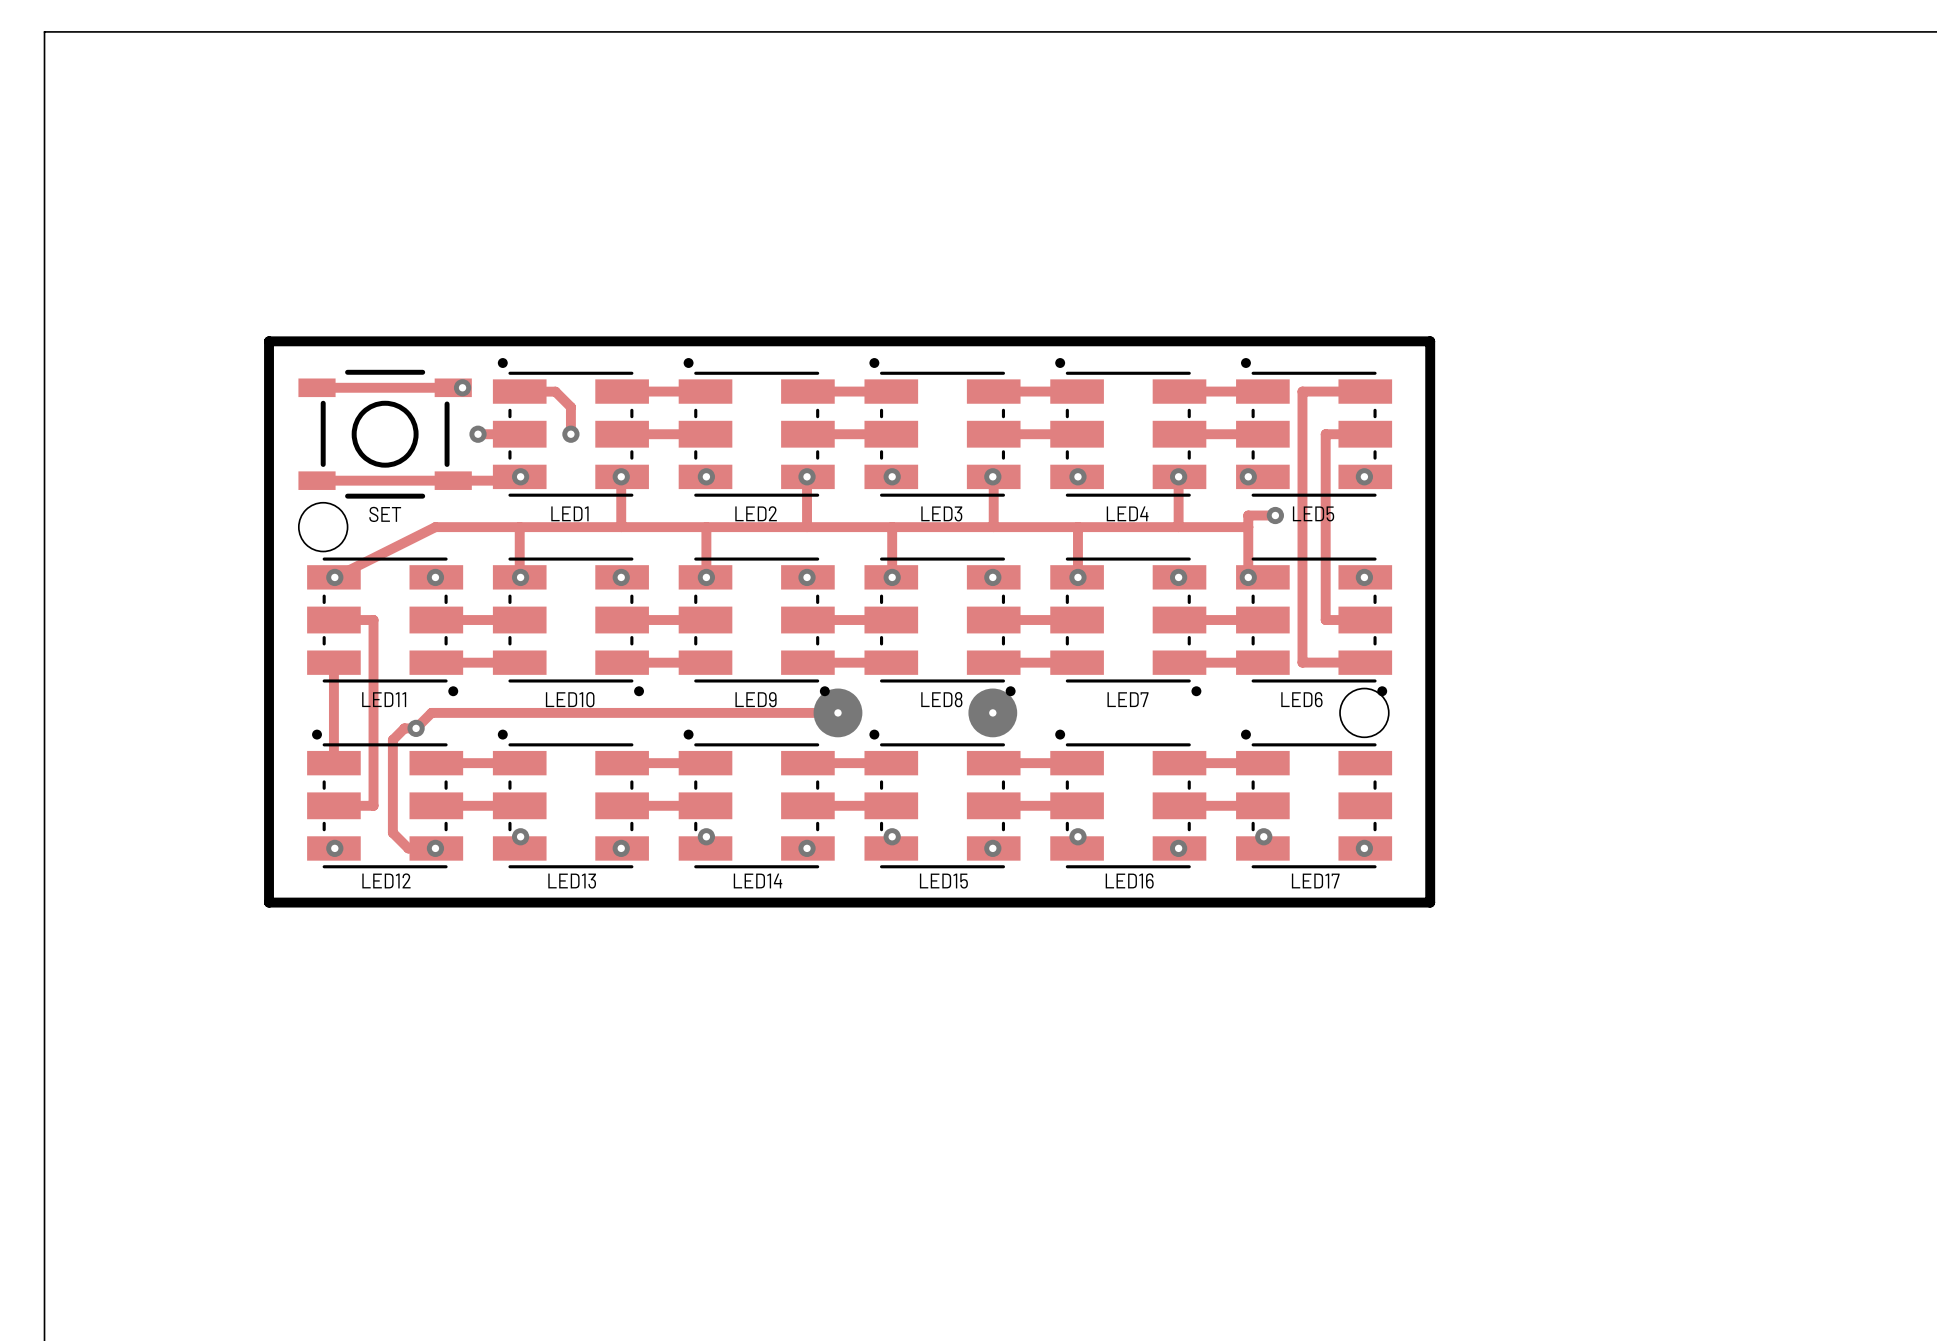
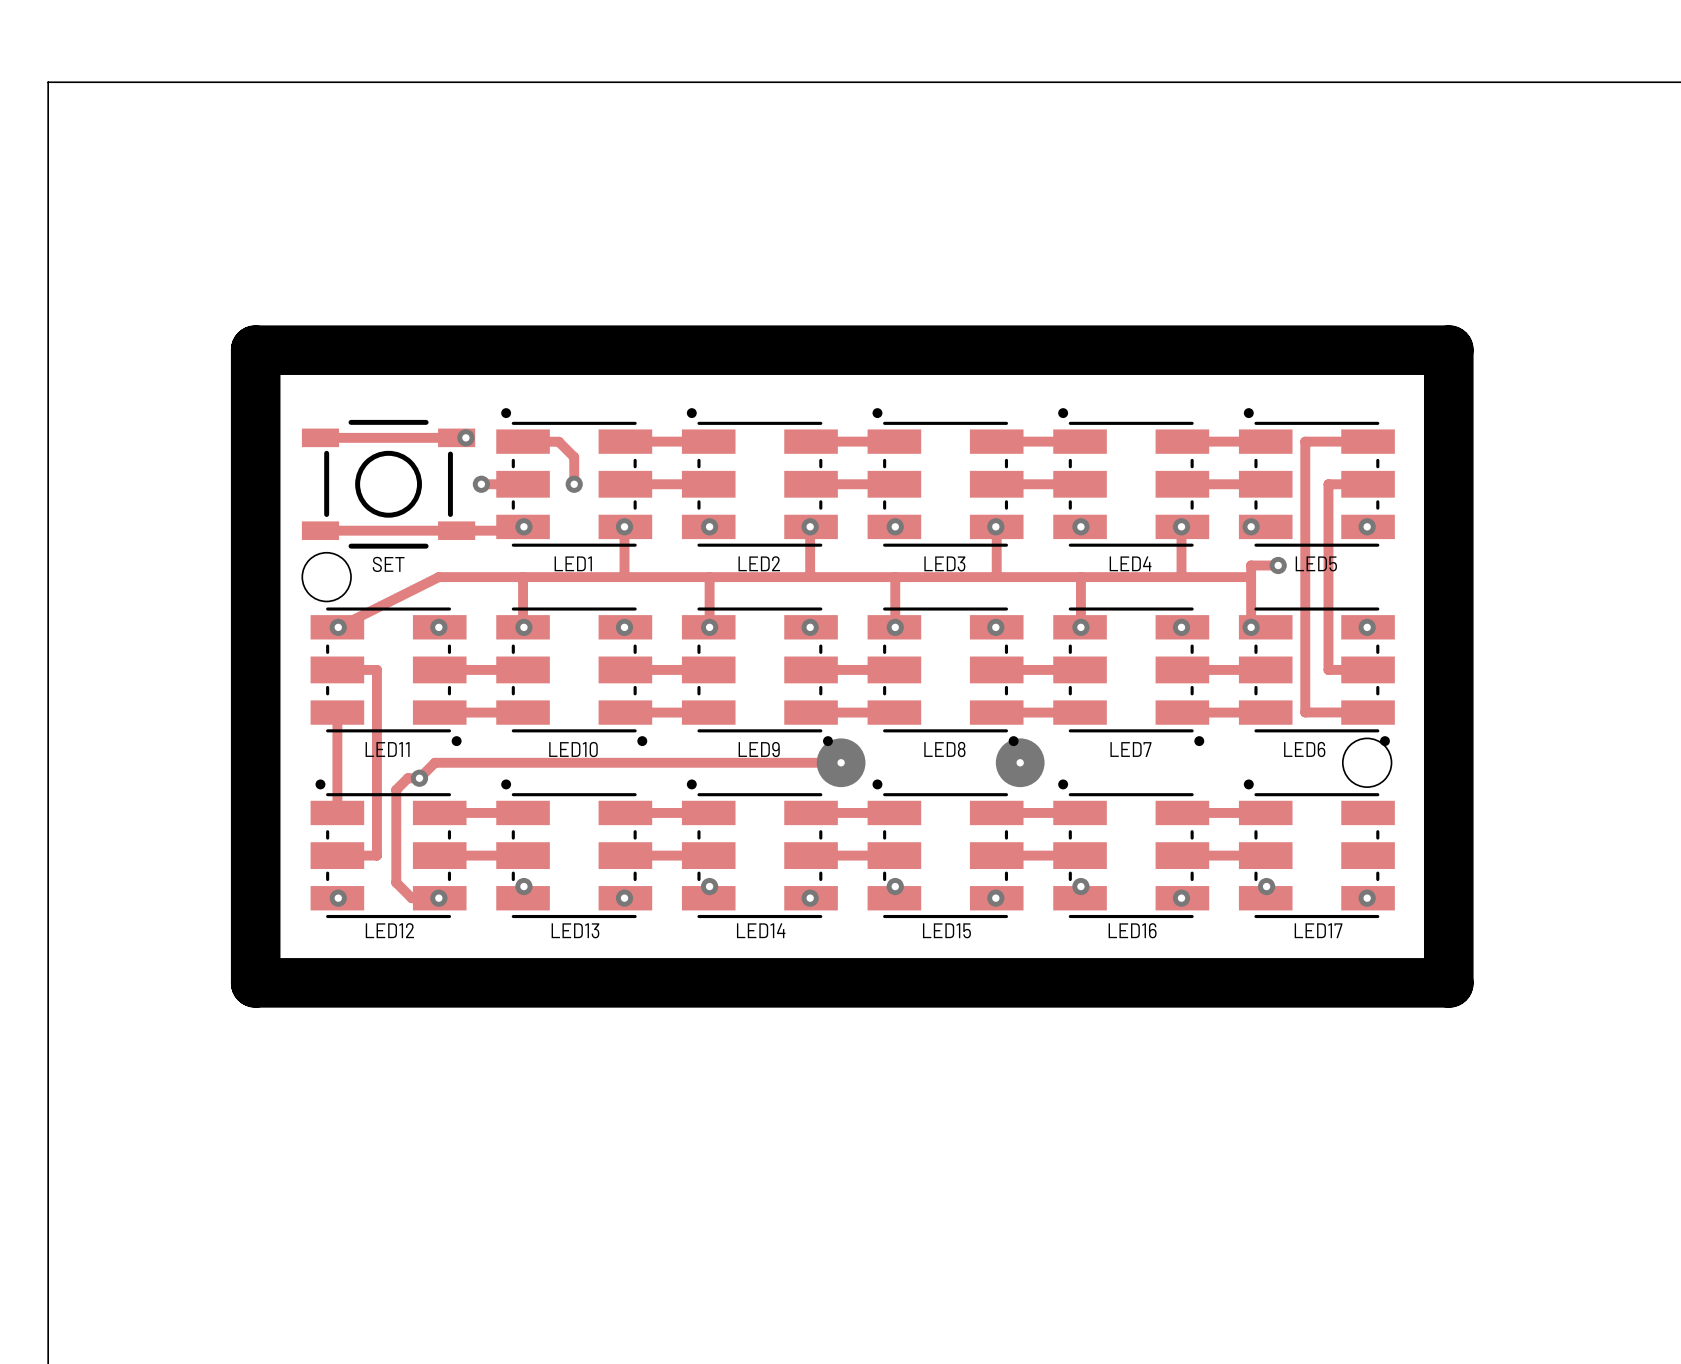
board edge: none -> (255, 349) (255, 983) (1449, 983) (1449, 349) (255, 349)
board edge: (269, 341) (269, 902) (1430, 902) (1430, 341) (269, 341) -> (279, 374) (279, 958) (1424, 958) (1424, 374) (279, 374)
via position: (992, 712) -> (1020, 762)

